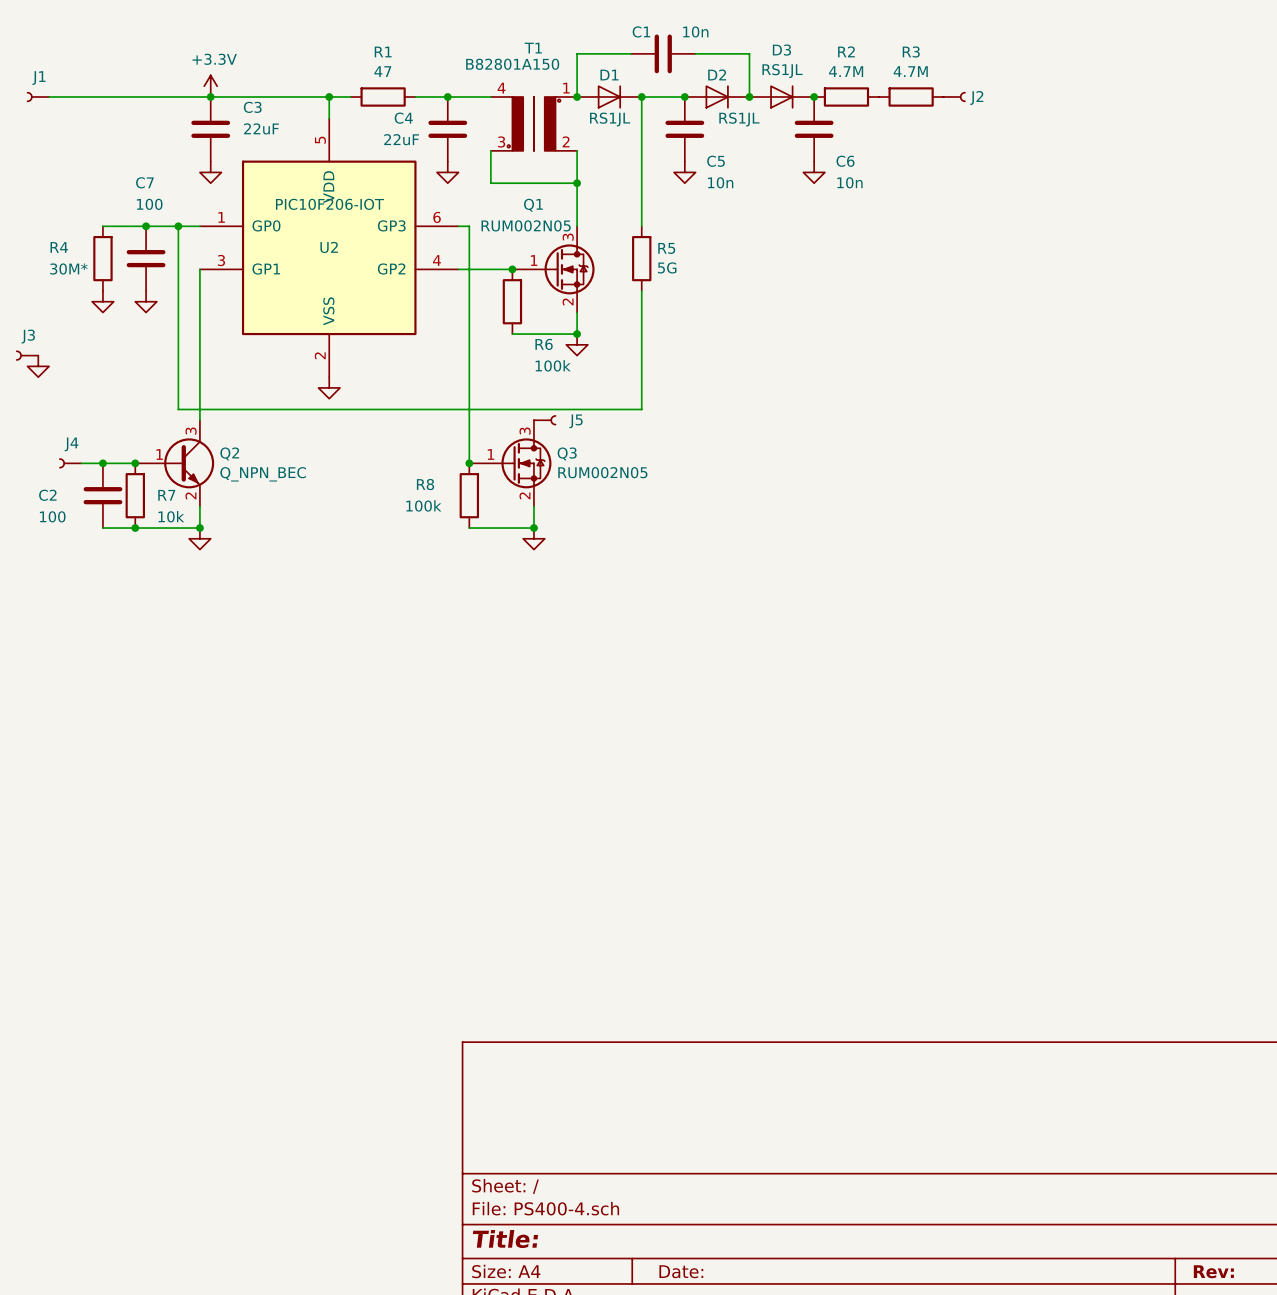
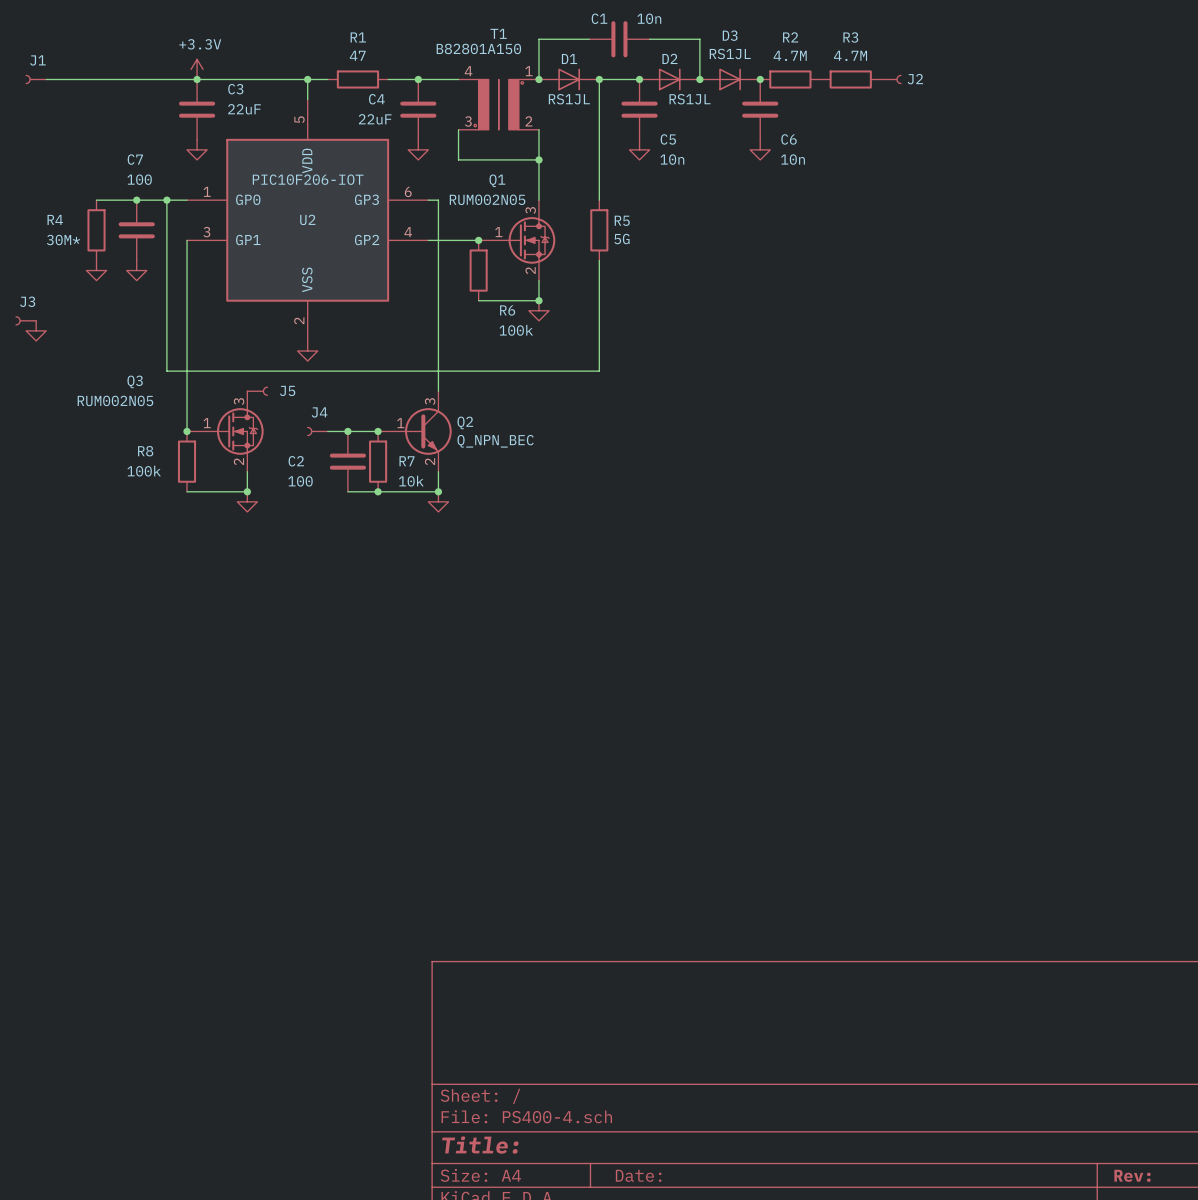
wire: none -> (187, 381) (187, 431)
J5 position: (545, 420) -> (257, 391)
Q3 name position: Q3 (567, 453) -> Q3 (135, 381)
J4 position: (70, 463) -> (317, 431)
wire: (81, 463) (135, 463) -> none
junction: (102, 463) -> none
junction: (135, 463) -> none
Q2 position: (174, 463) -> (414, 431)
junction: (469, 463) -> none
Q3 position: (510, 463) -> (225, 431)
Q3 value position: RUM002N05 (602, 472) -> RUM002N05 (115, 400)
junction: none -> (187, 431)
wire: none -> (327, 431) (378, 431)
junction: none -> (347, 431)
junction: none -> (378, 431)
C2 position: (102, 495) -> (347, 461)
R7 position: (135, 495) -> (378, 461)
R8 position: (469, 495) -> (187, 461)
wire: (199, 506) (199, 528) (102, 528) -> none
wire: (533, 506) (533, 528) (469, 528) -> none
wire: none -> (247, 471) (247, 491) (187, 491)
wire: none -> (438, 471) (438, 491) (347, 491)
junction: (135, 528) -> none
junction: (199, 528) -> none
junction: (533, 528) -> none
power symbol position: (199, 538) -> (247, 501)
junction: none -> (247, 491)
junction: none -> (378, 491)
junction: none -> (438, 491)
power symbol position: (533, 538) -> (438, 501)

